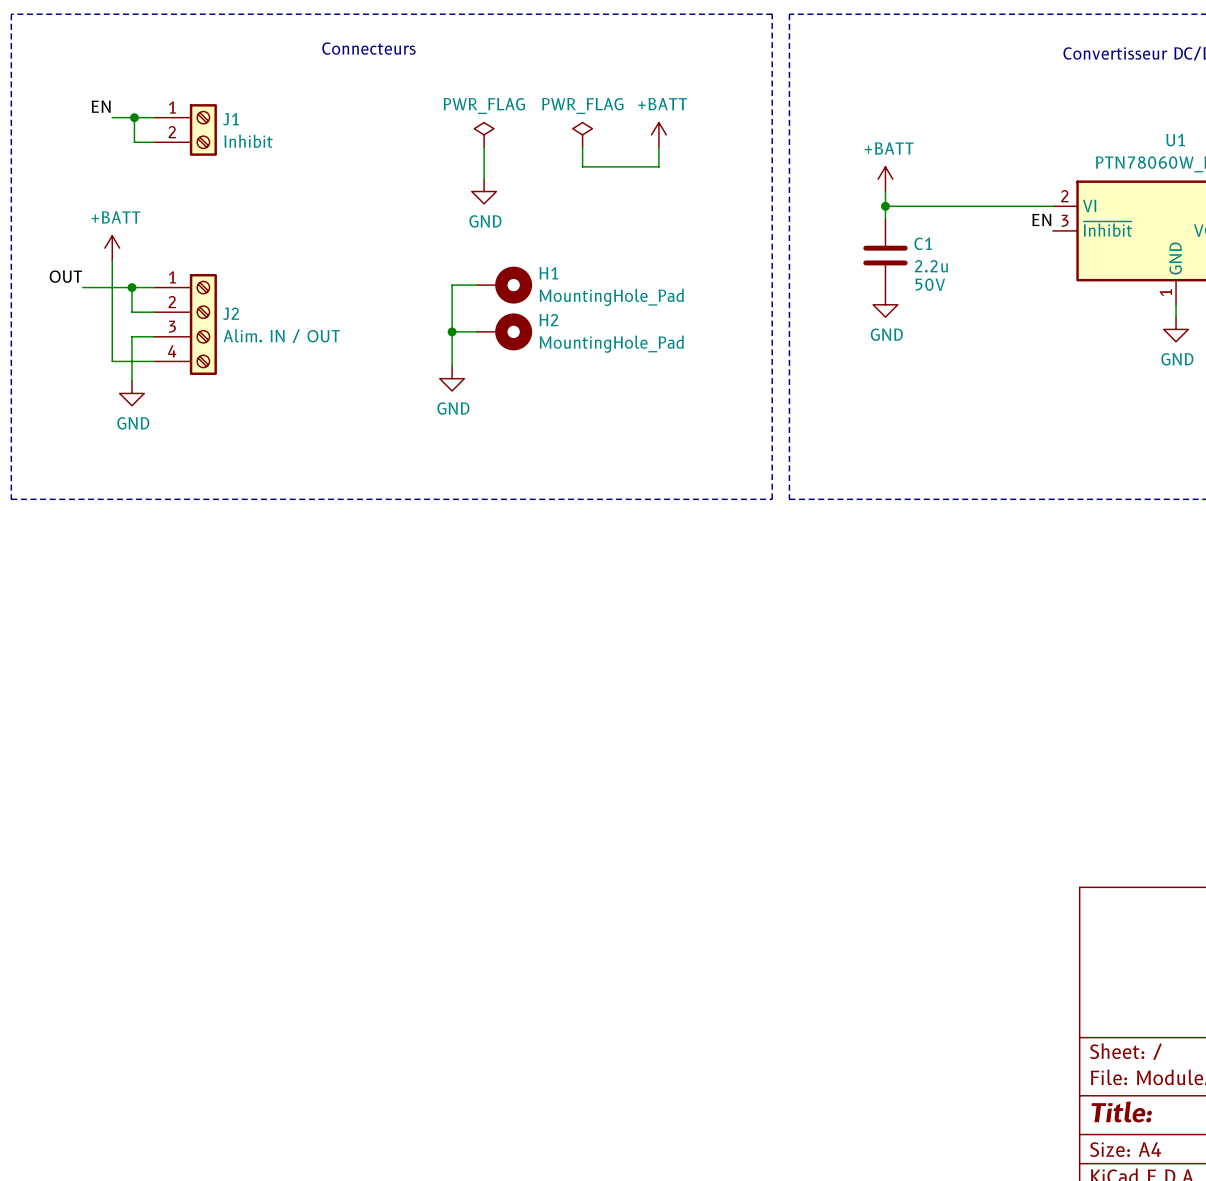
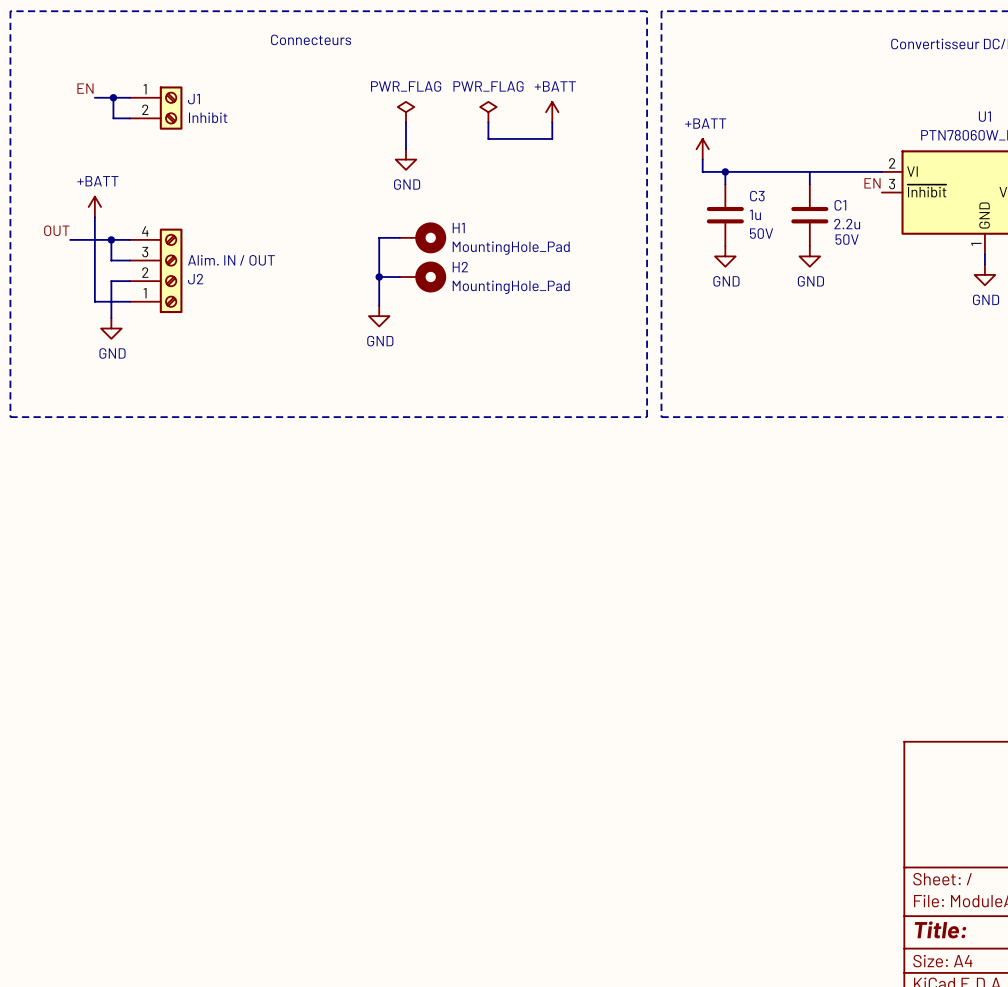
power symbol position: +BATT (885, 179) -> +BATT (702, 149)
wire: none -> (702, 159) (702, 171) (741, 171)
wire: (885, 191) (885, 218) -> none
wire: none -> (725, 171) (725, 184)
junction position: (885, 206) -> (725, 171)
wire: none -> (809, 171) (809, 184)
C1 position: (885, 255) -> (809, 215)
C3: none -> 1u (725, 215)
power symbol position: GND (885, 304) -> GND (725, 256)
power symbol: none -> GND (809, 256)
J2 flip: as is (203, 324) -> up-down (171, 270)

